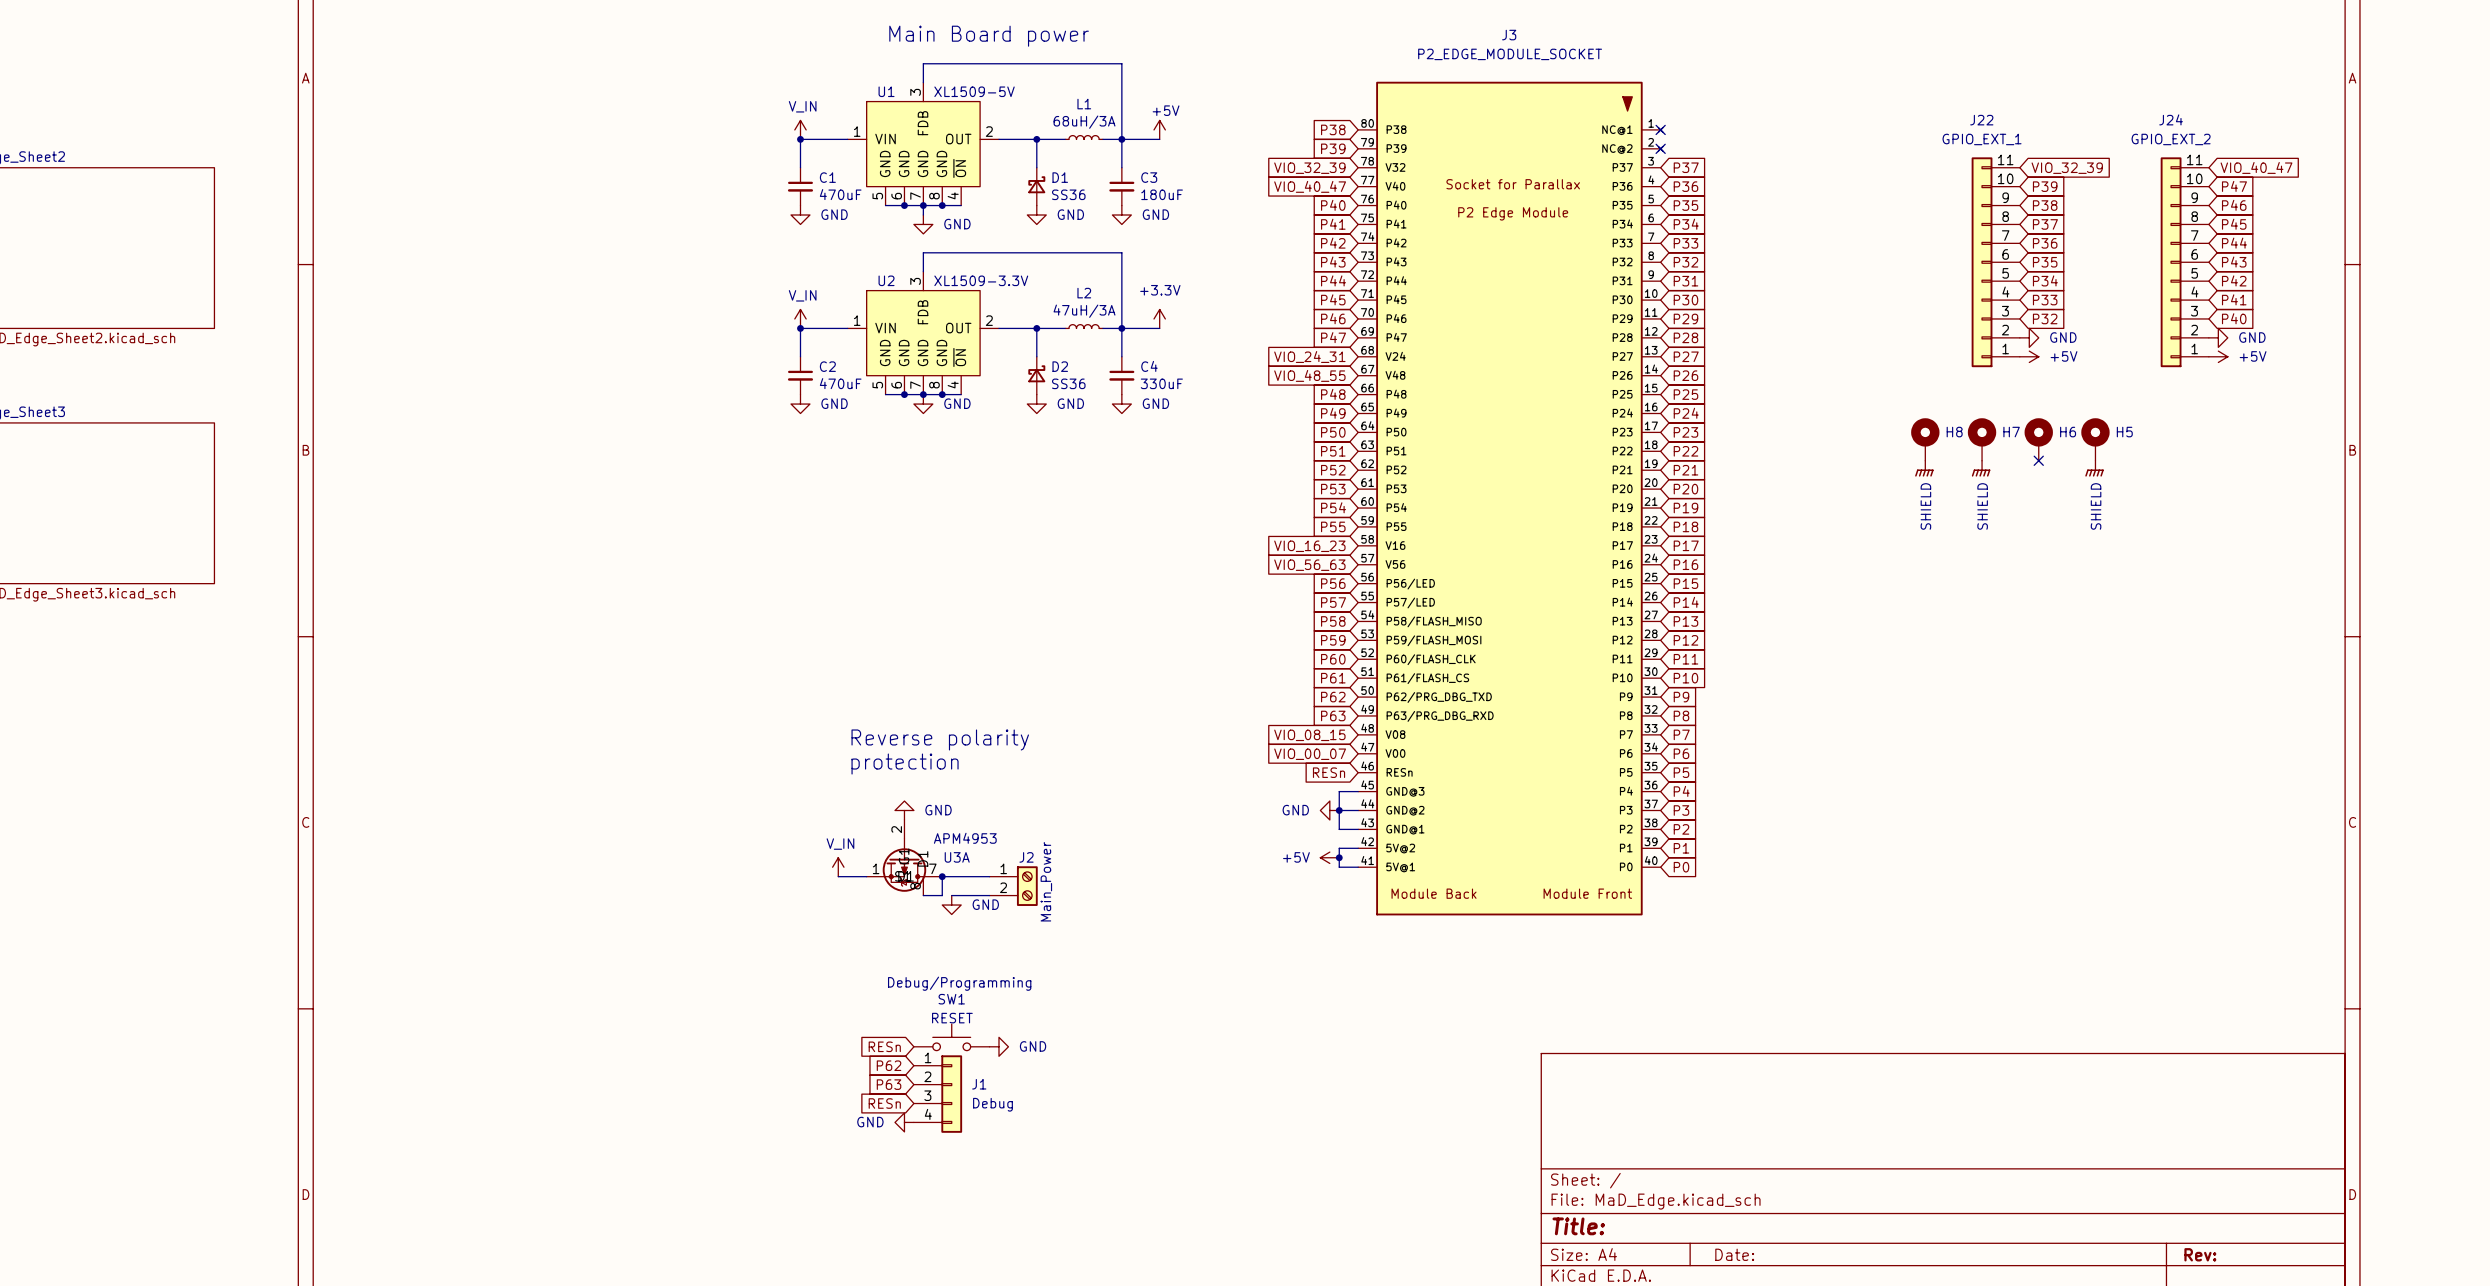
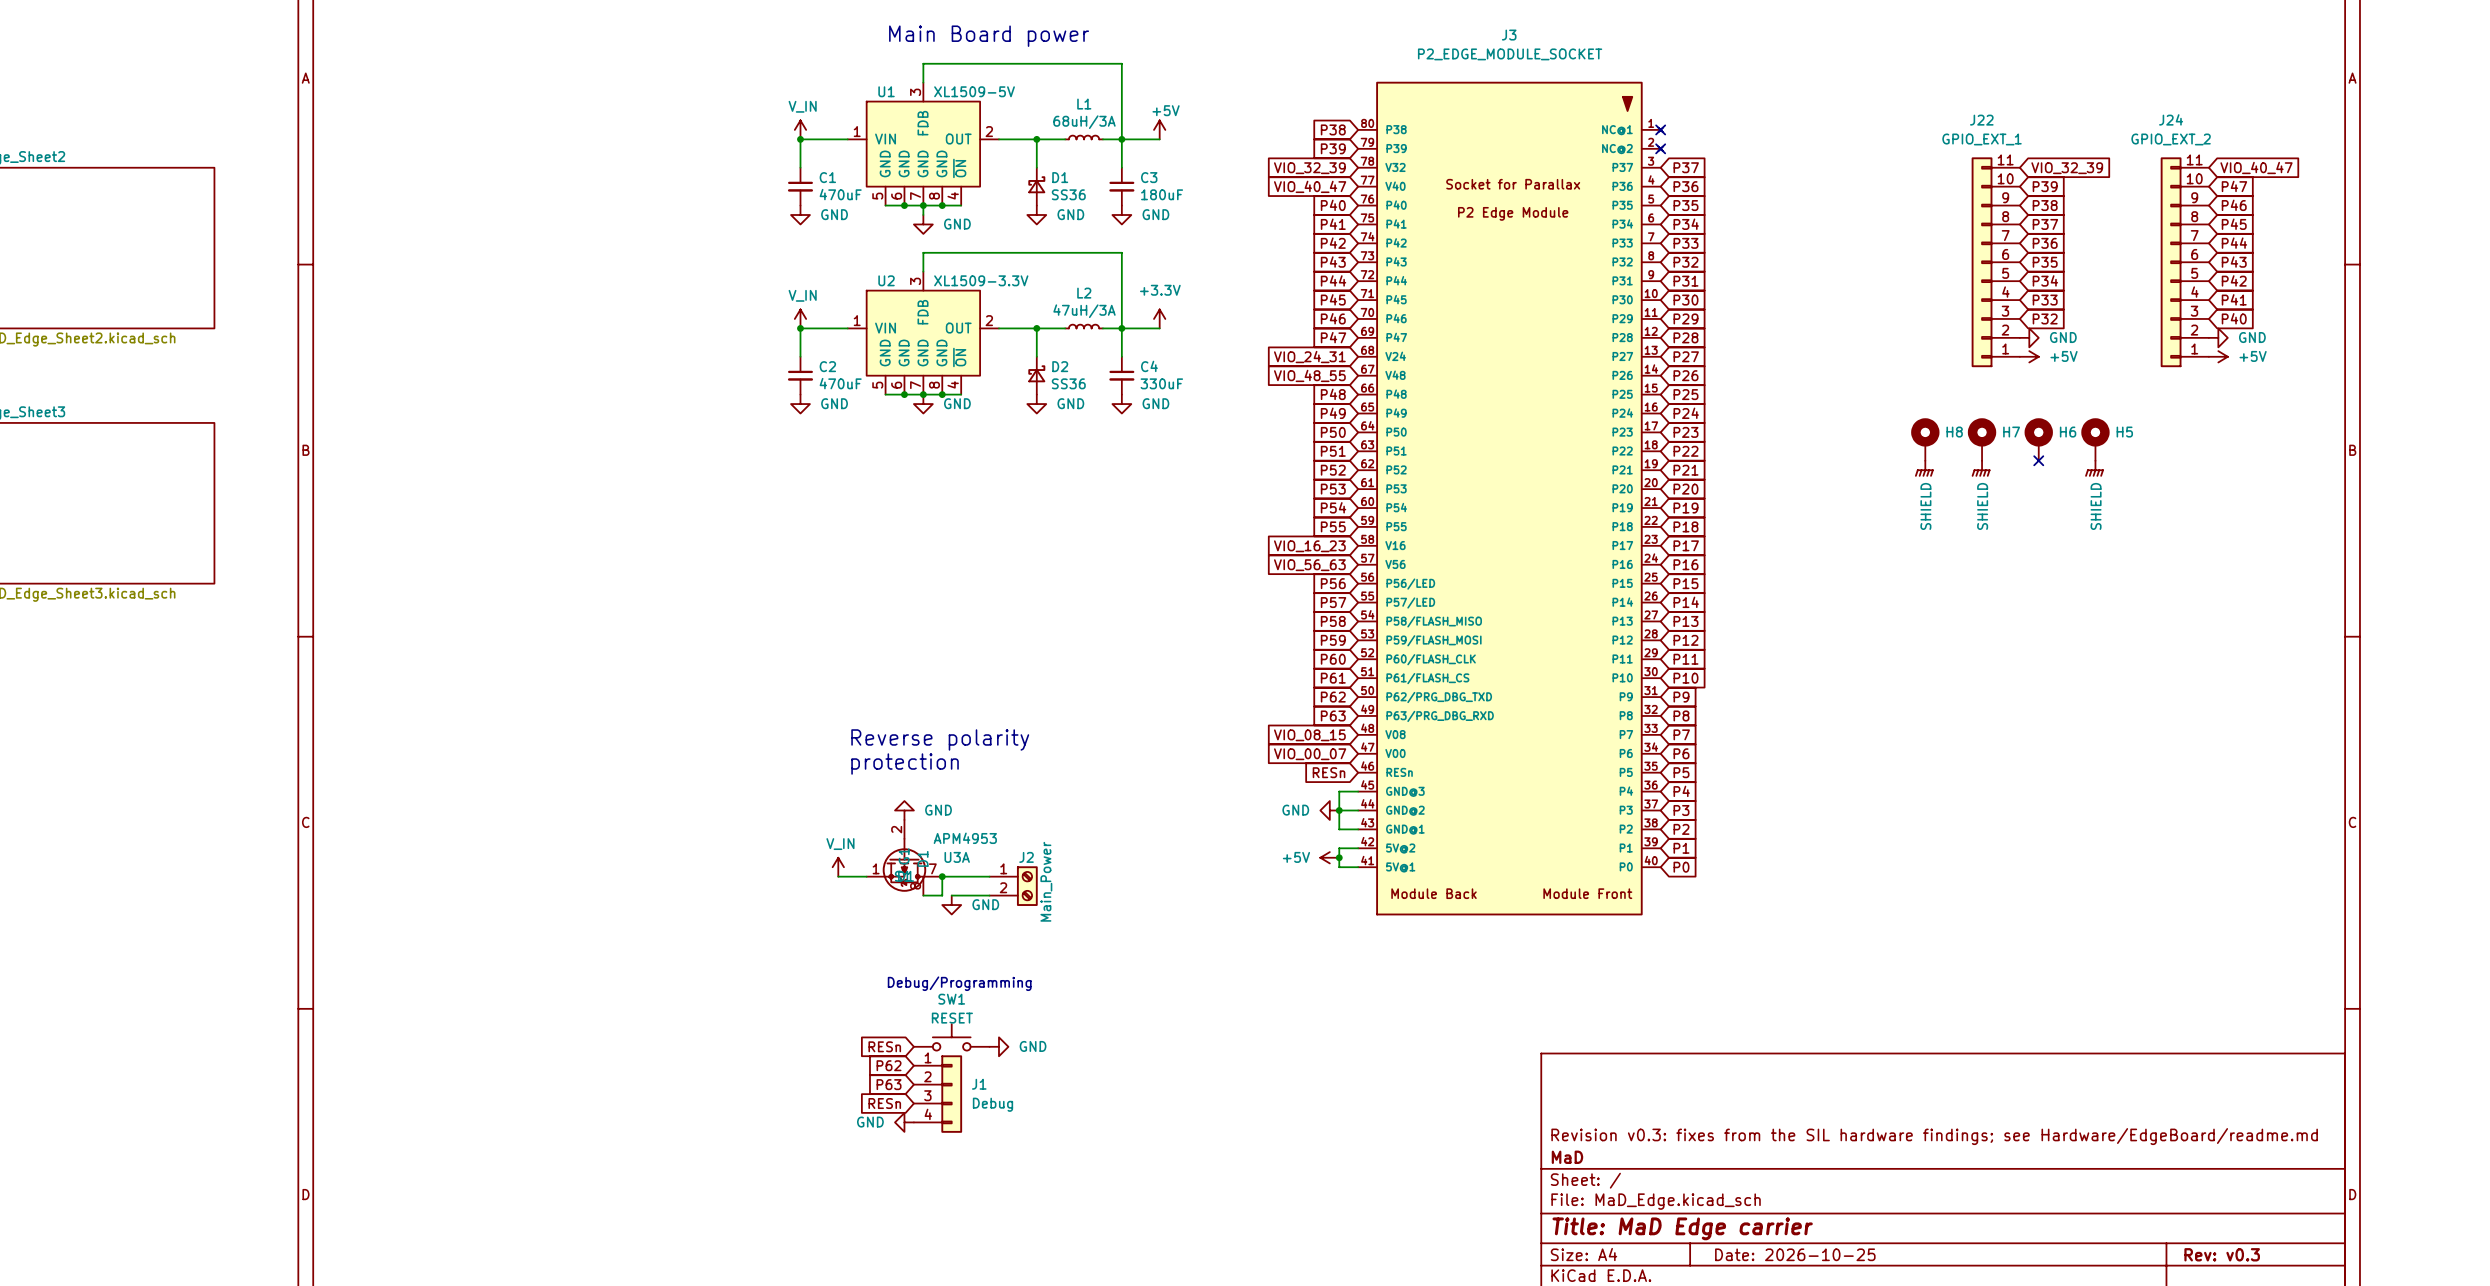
title block: none -> Revision v0.3: fixes from the SIL hardware findings; see Hardware/EdgeBoard/readme.md (1934, 1136)
title block: none -> MaD (1567, 1157)
title block: Title: (1578, 1226) -> Title: MaD Edge carrier (1682, 1228)
title block: Date: (1734, 1254) -> Date: 2026-10-25 (1795, 1254)
title block: Rev: (2200, 1254) -> Rev: v0.3 (2222, 1254)

